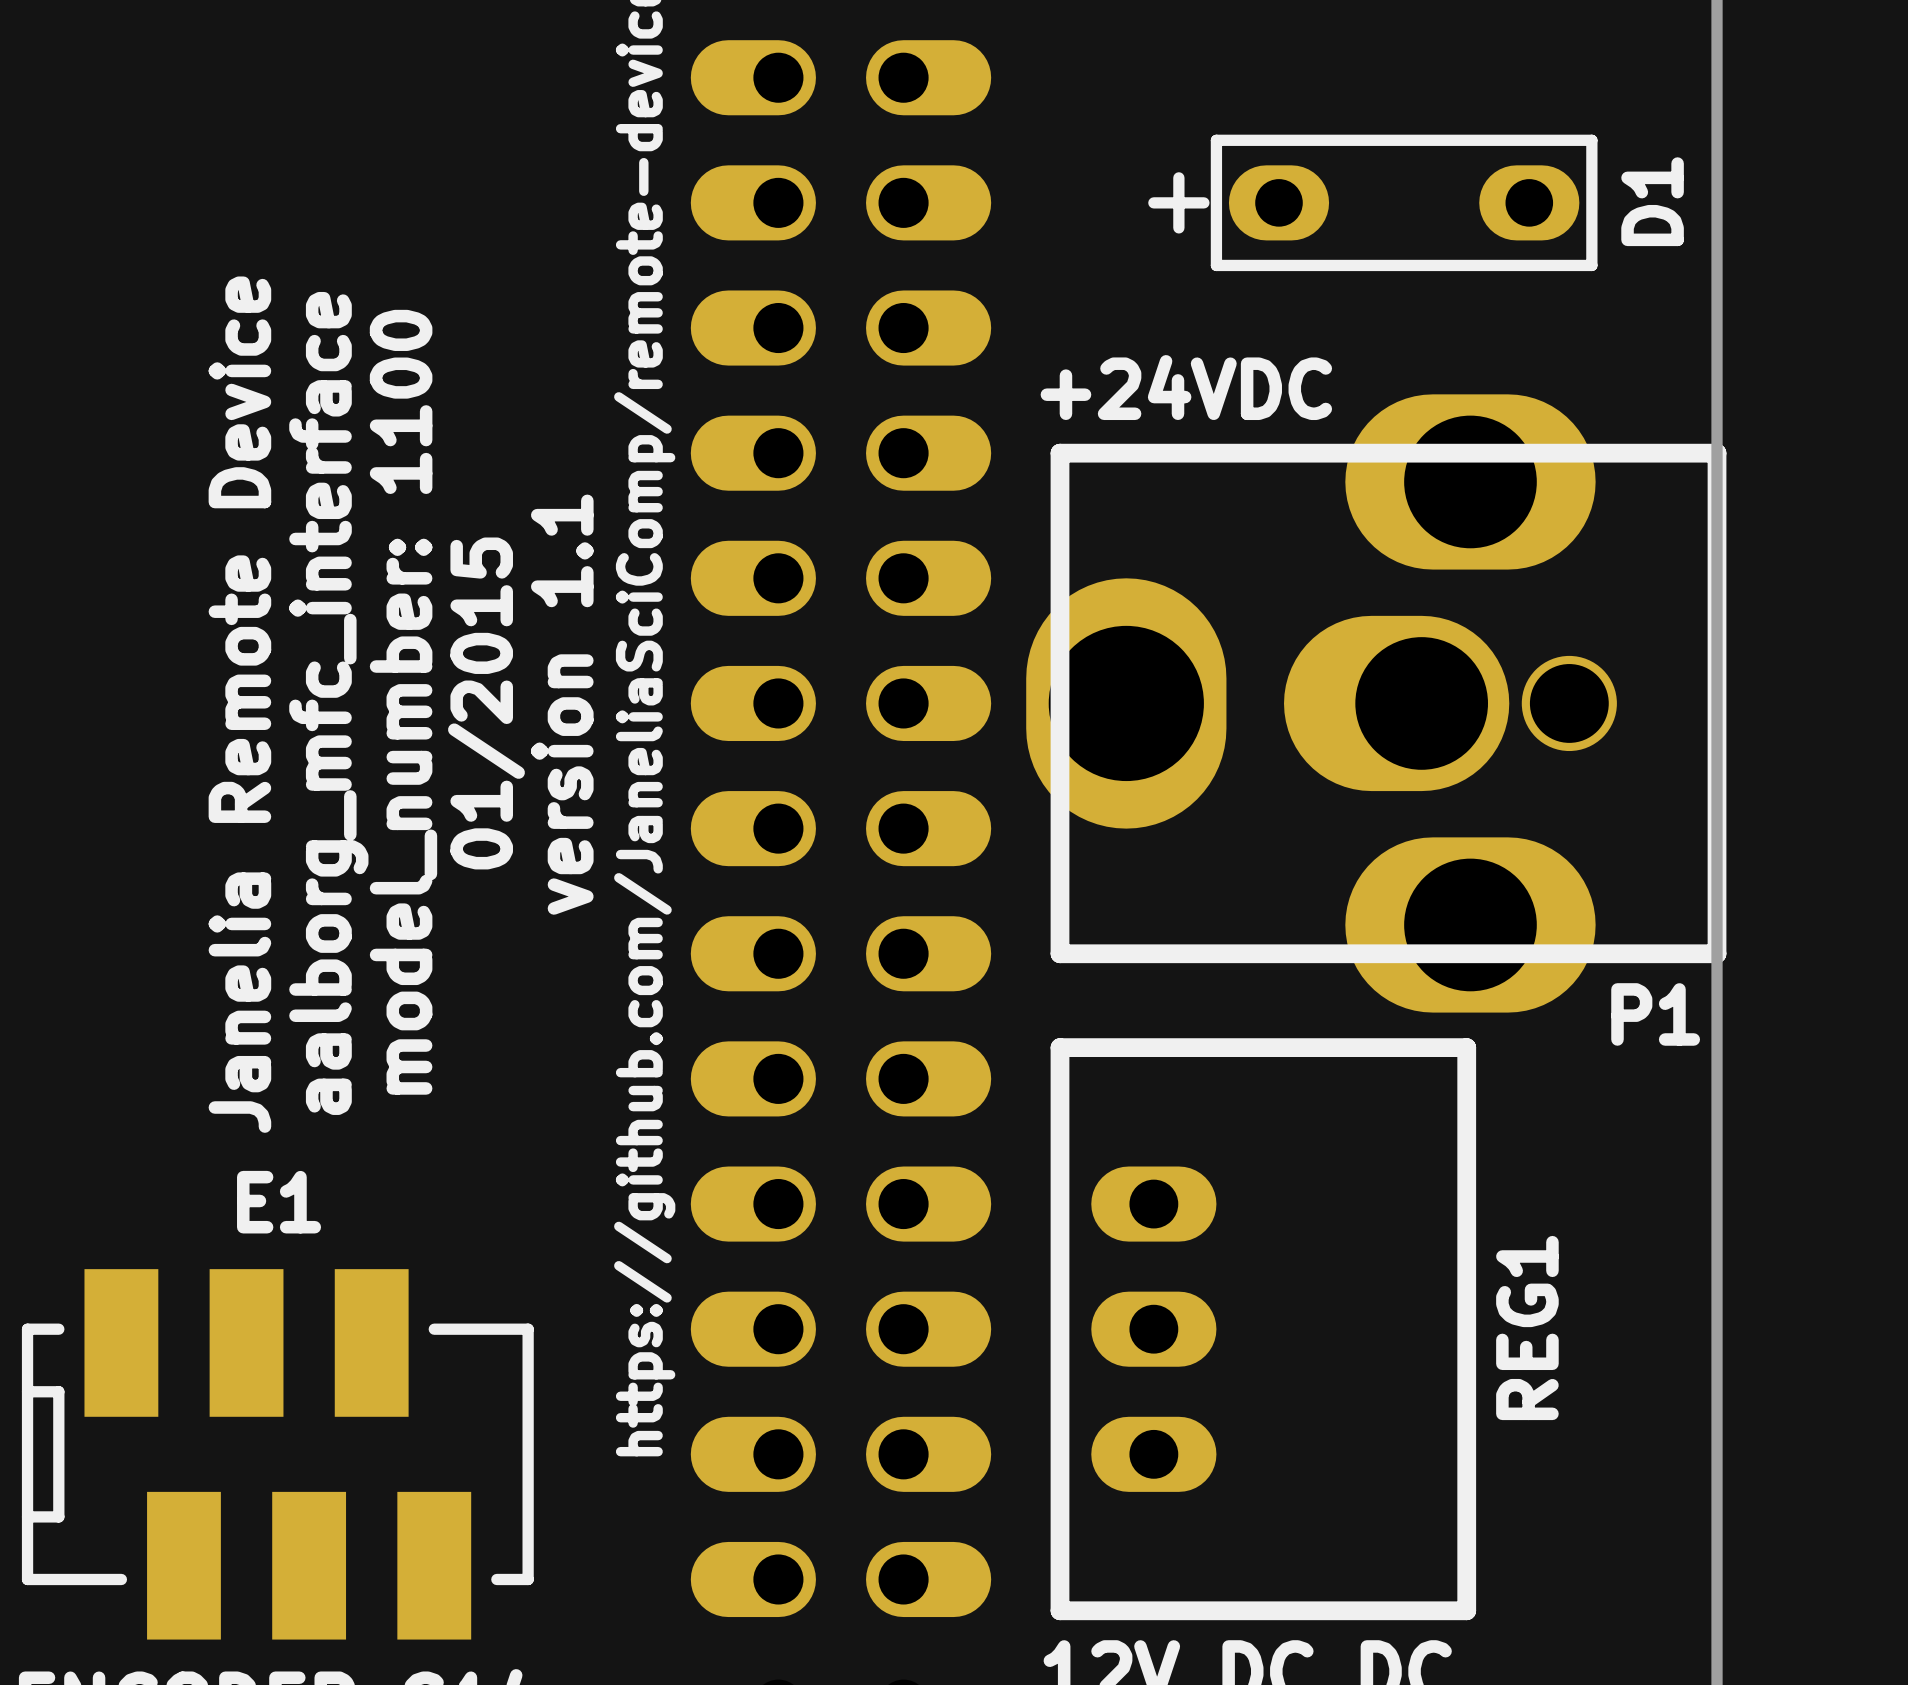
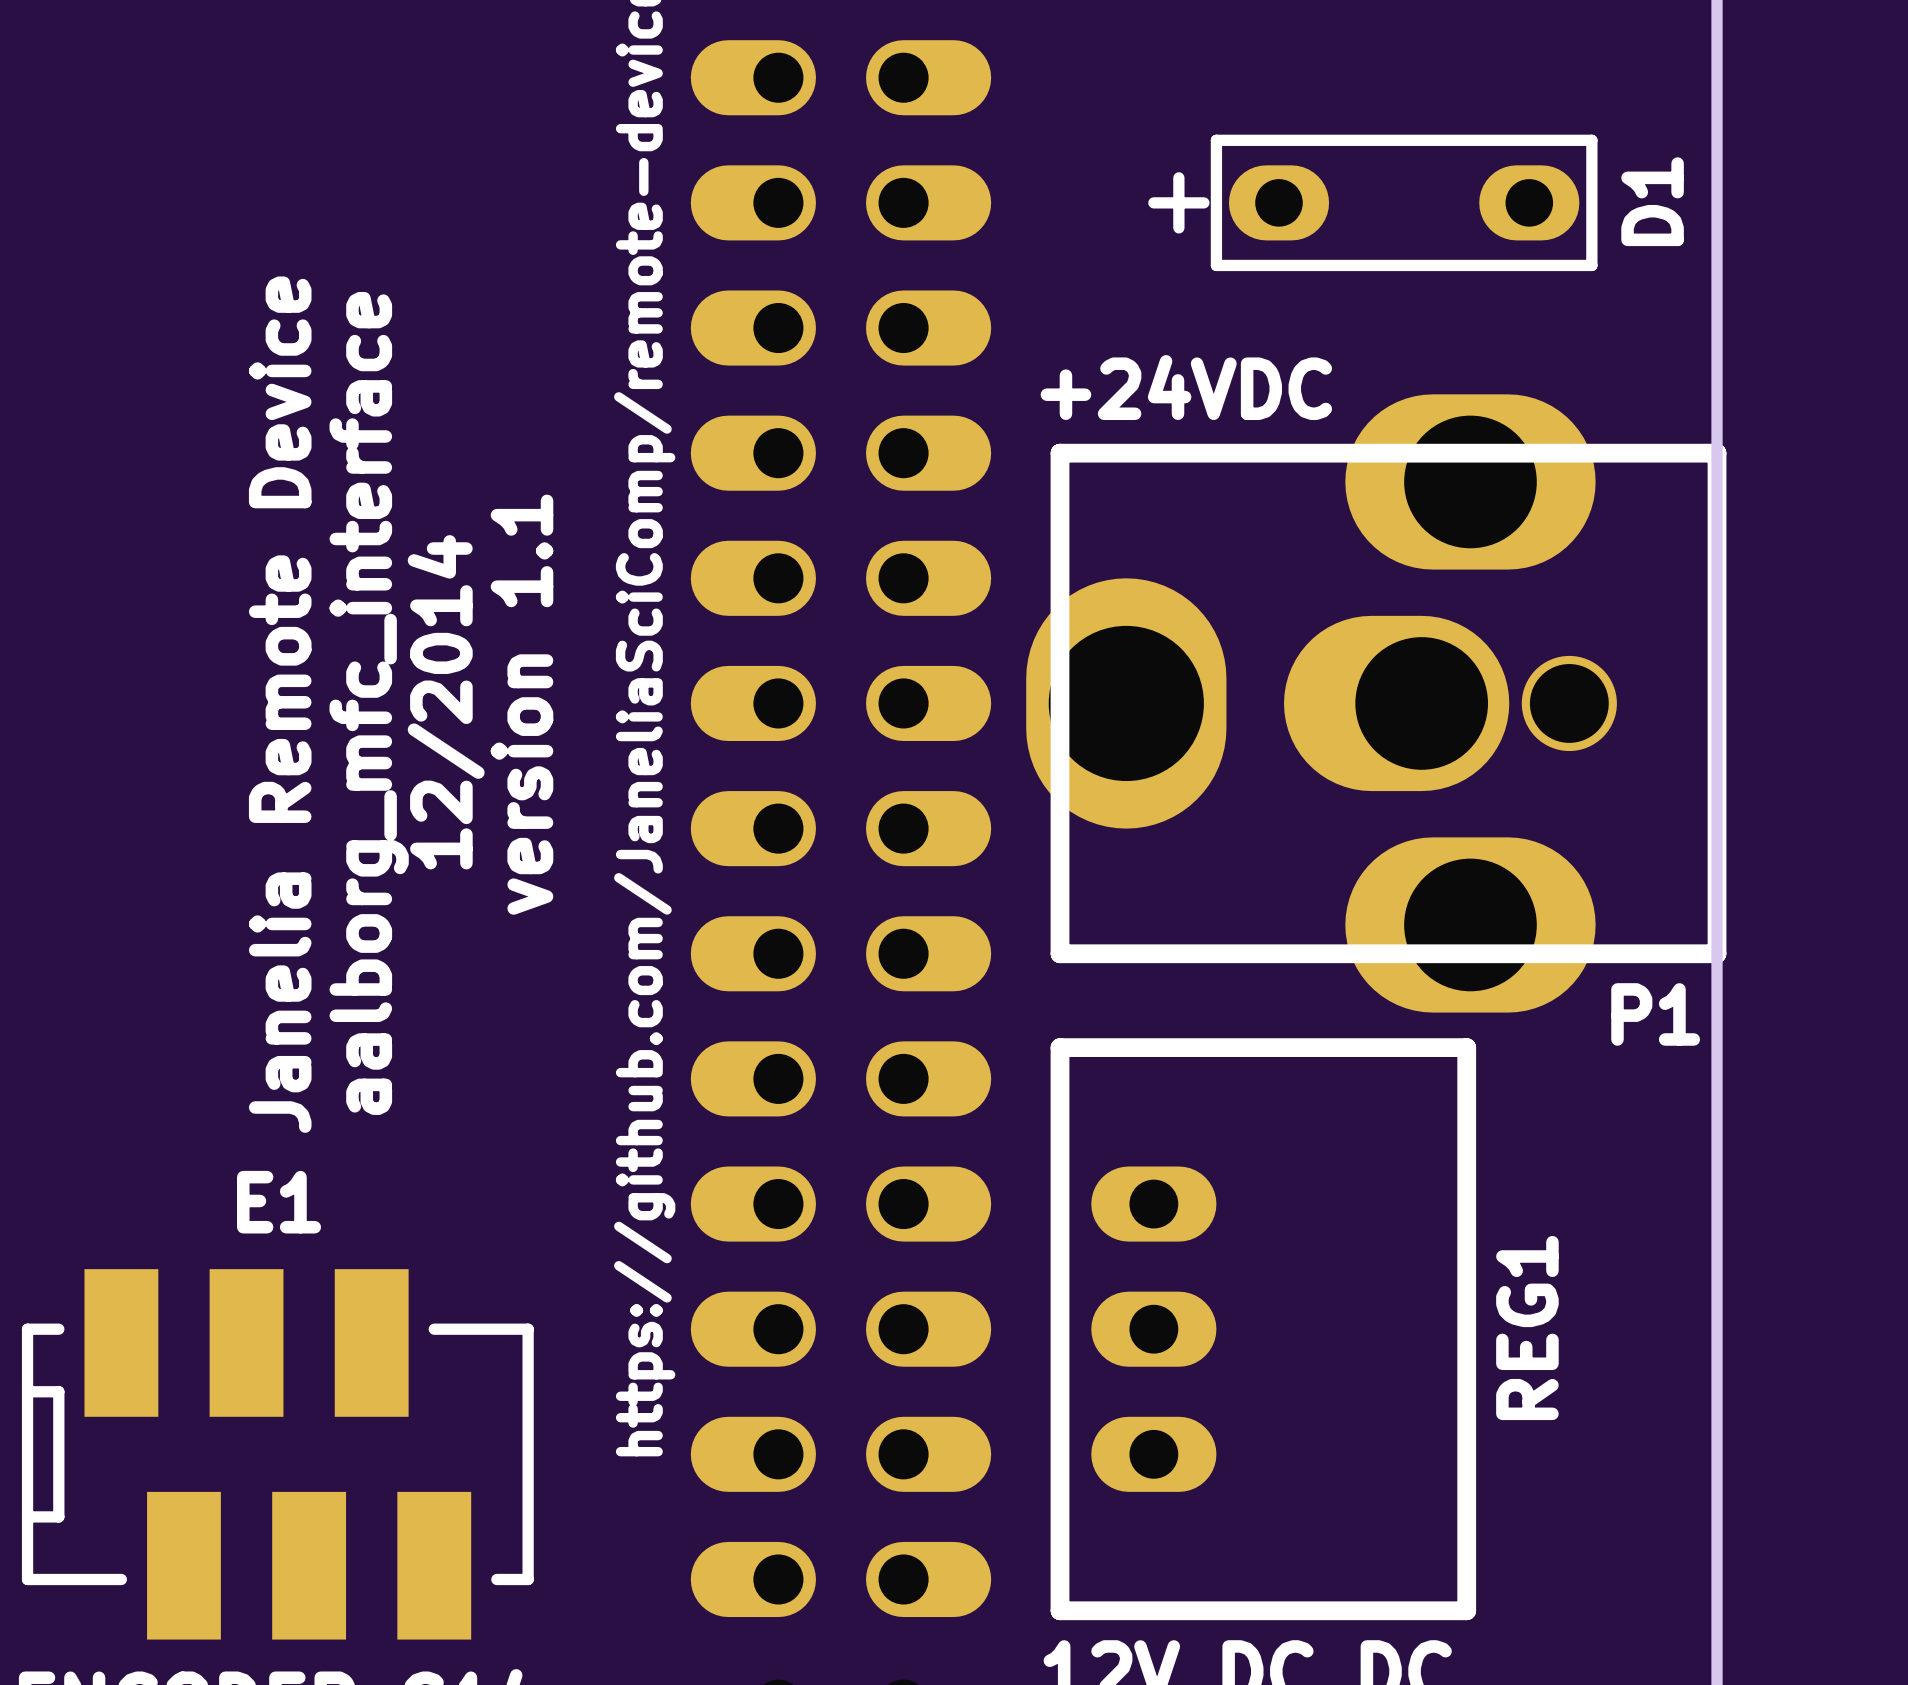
text: model_number: 1100 (403, 702) -> none
text position: aalborg_mfc_interface (328, 703) -> aalborg_mfc_interface (369, 703)
text: 01/2015 (486, 703) -> 12/2014 (446, 702)
text position: Janelia Remote Device (239, 704) -> Janelia Remote Device (280, 704)
text position: version 1.1 (562, 704) -> version 1.1 (522, 704)

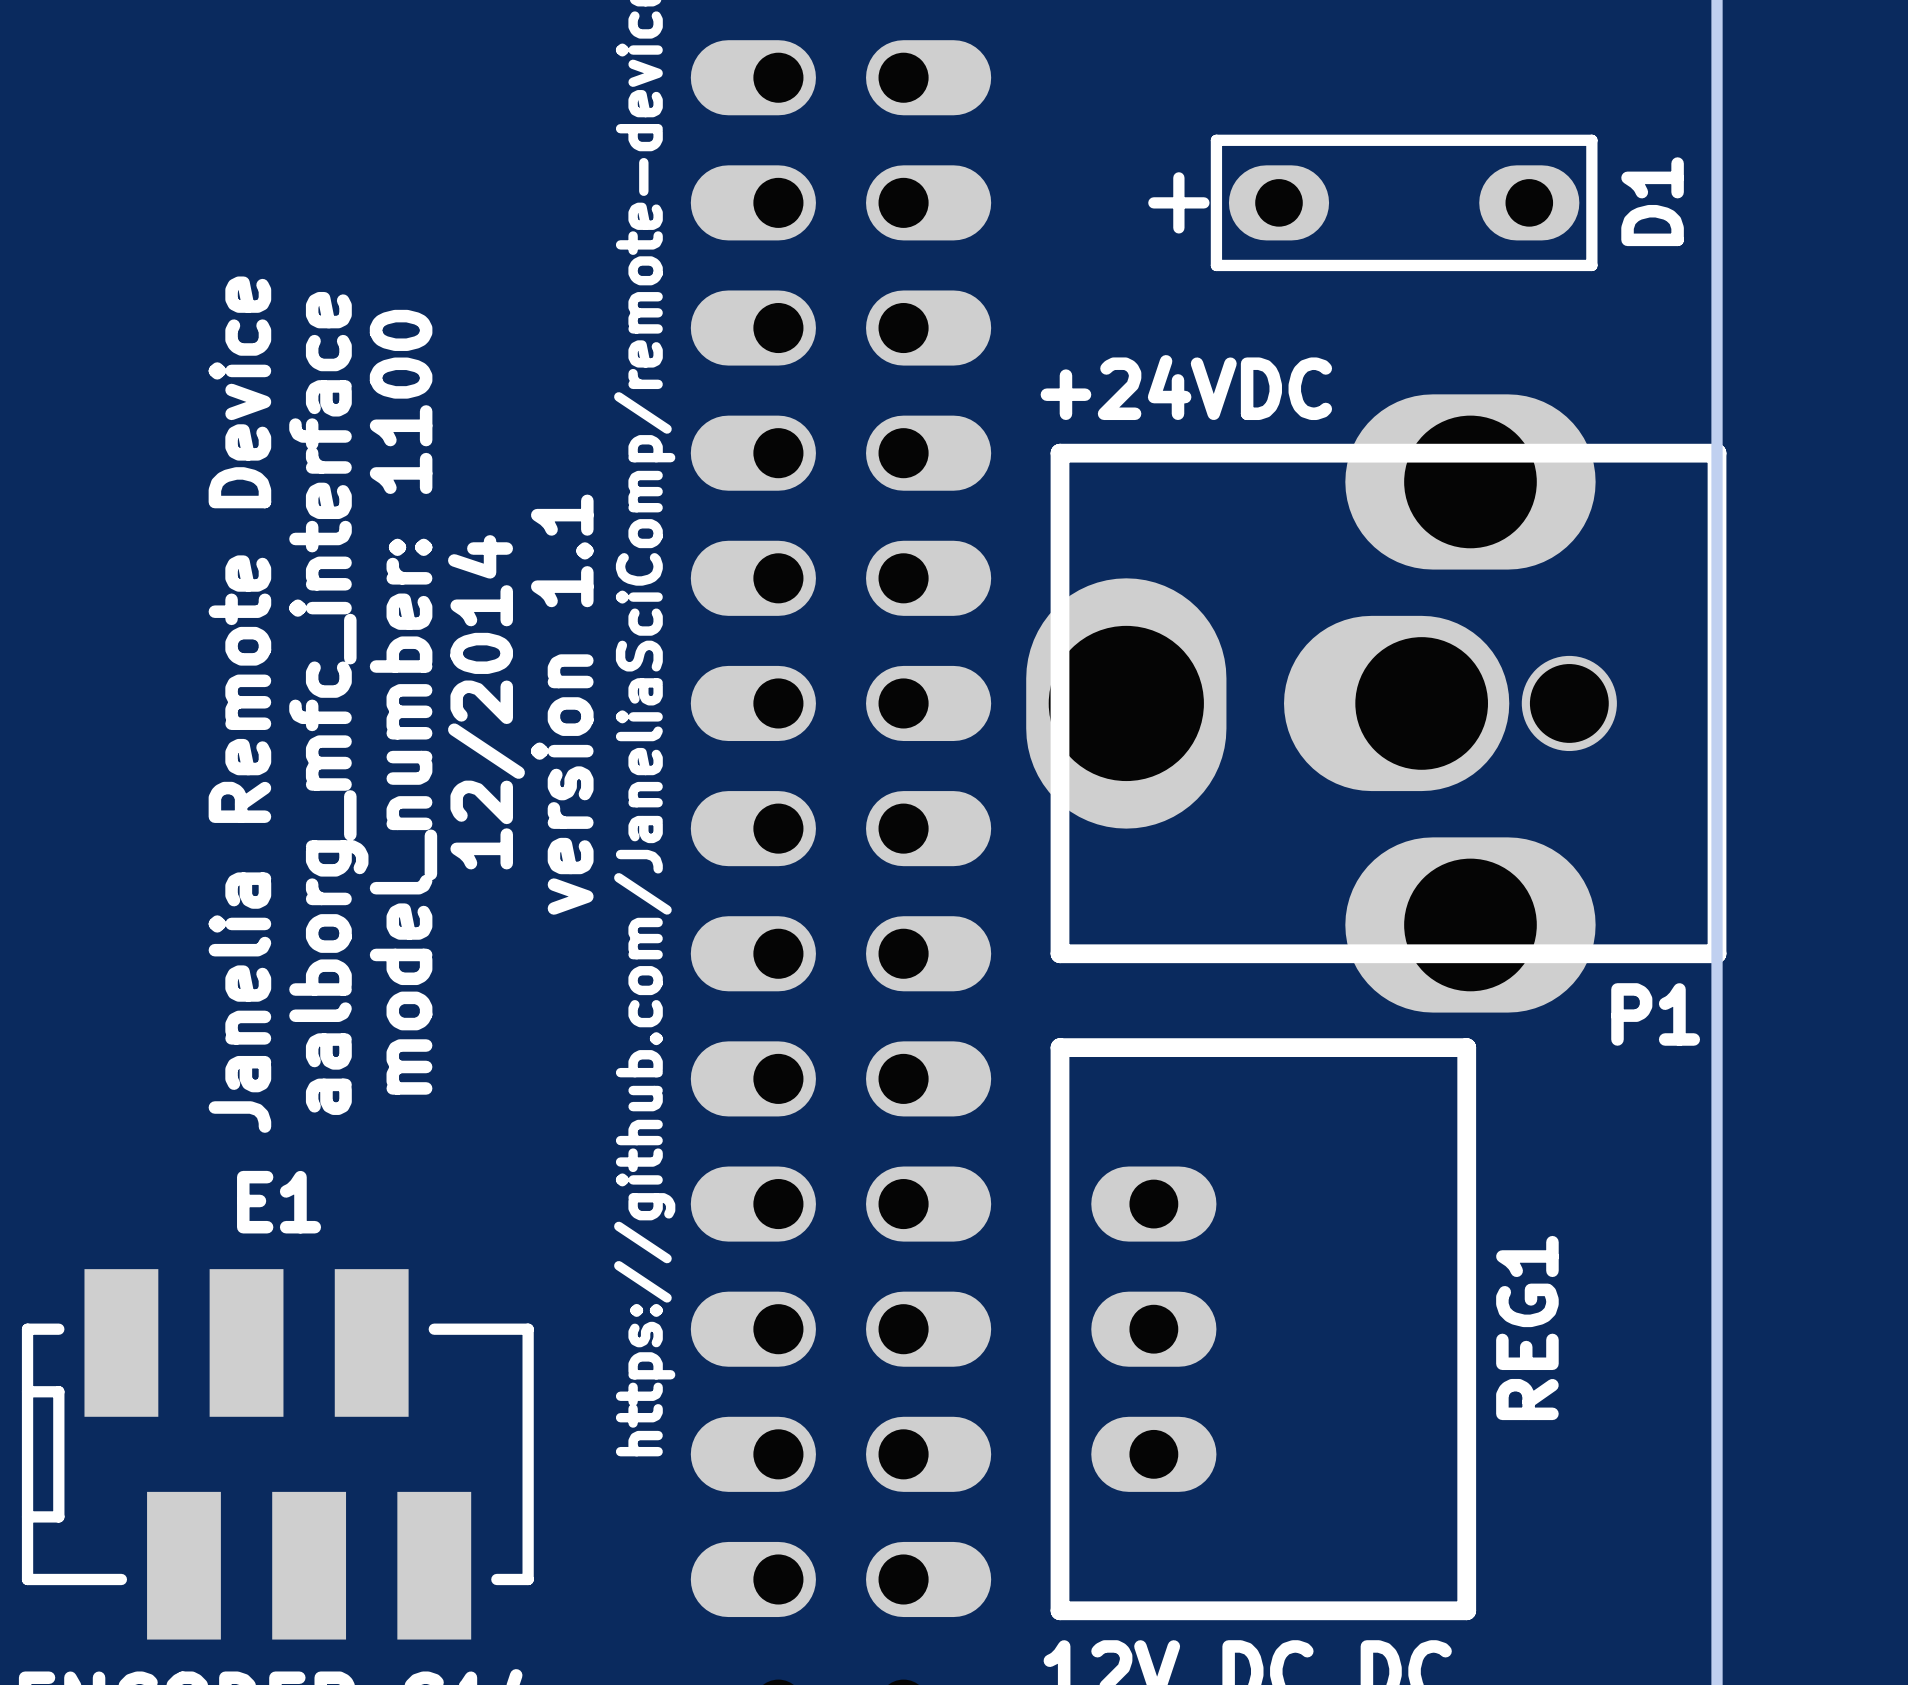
text: none -> model_number: 1100 (403, 702)
text position: 12/2014 (446, 702) -> 12/2014 (486, 702)
text position: aalborg_mfc_interface (369, 703) -> aalborg_mfc_interface (328, 703)
text position: Janelia Remote Device (280, 704) -> Janelia Remote Device (239, 704)
text position: version 1.1 (522, 704) -> version 1.1 (562, 704)

